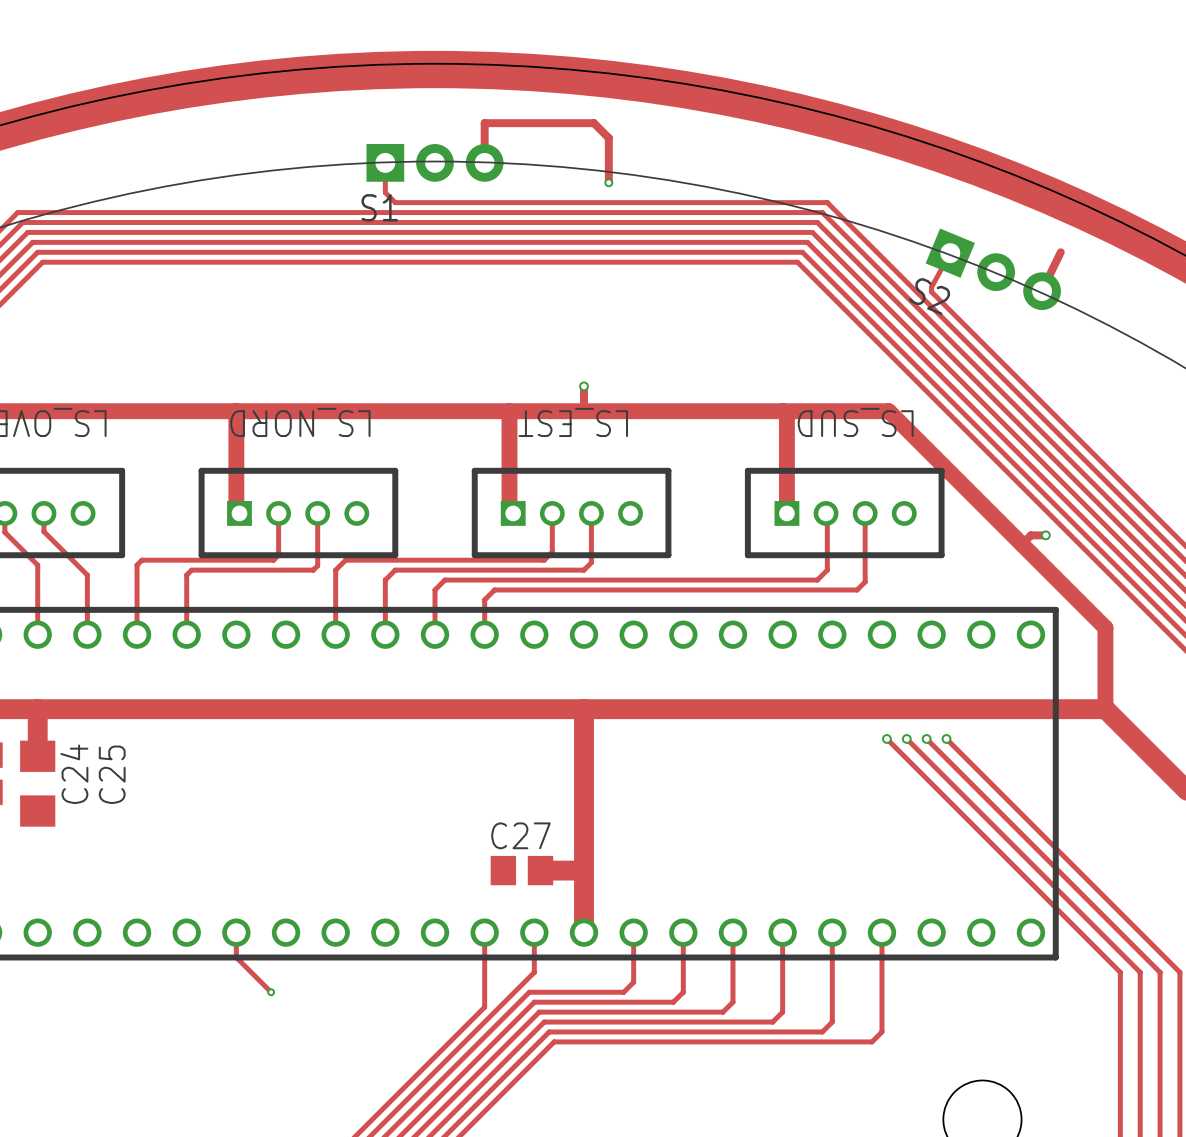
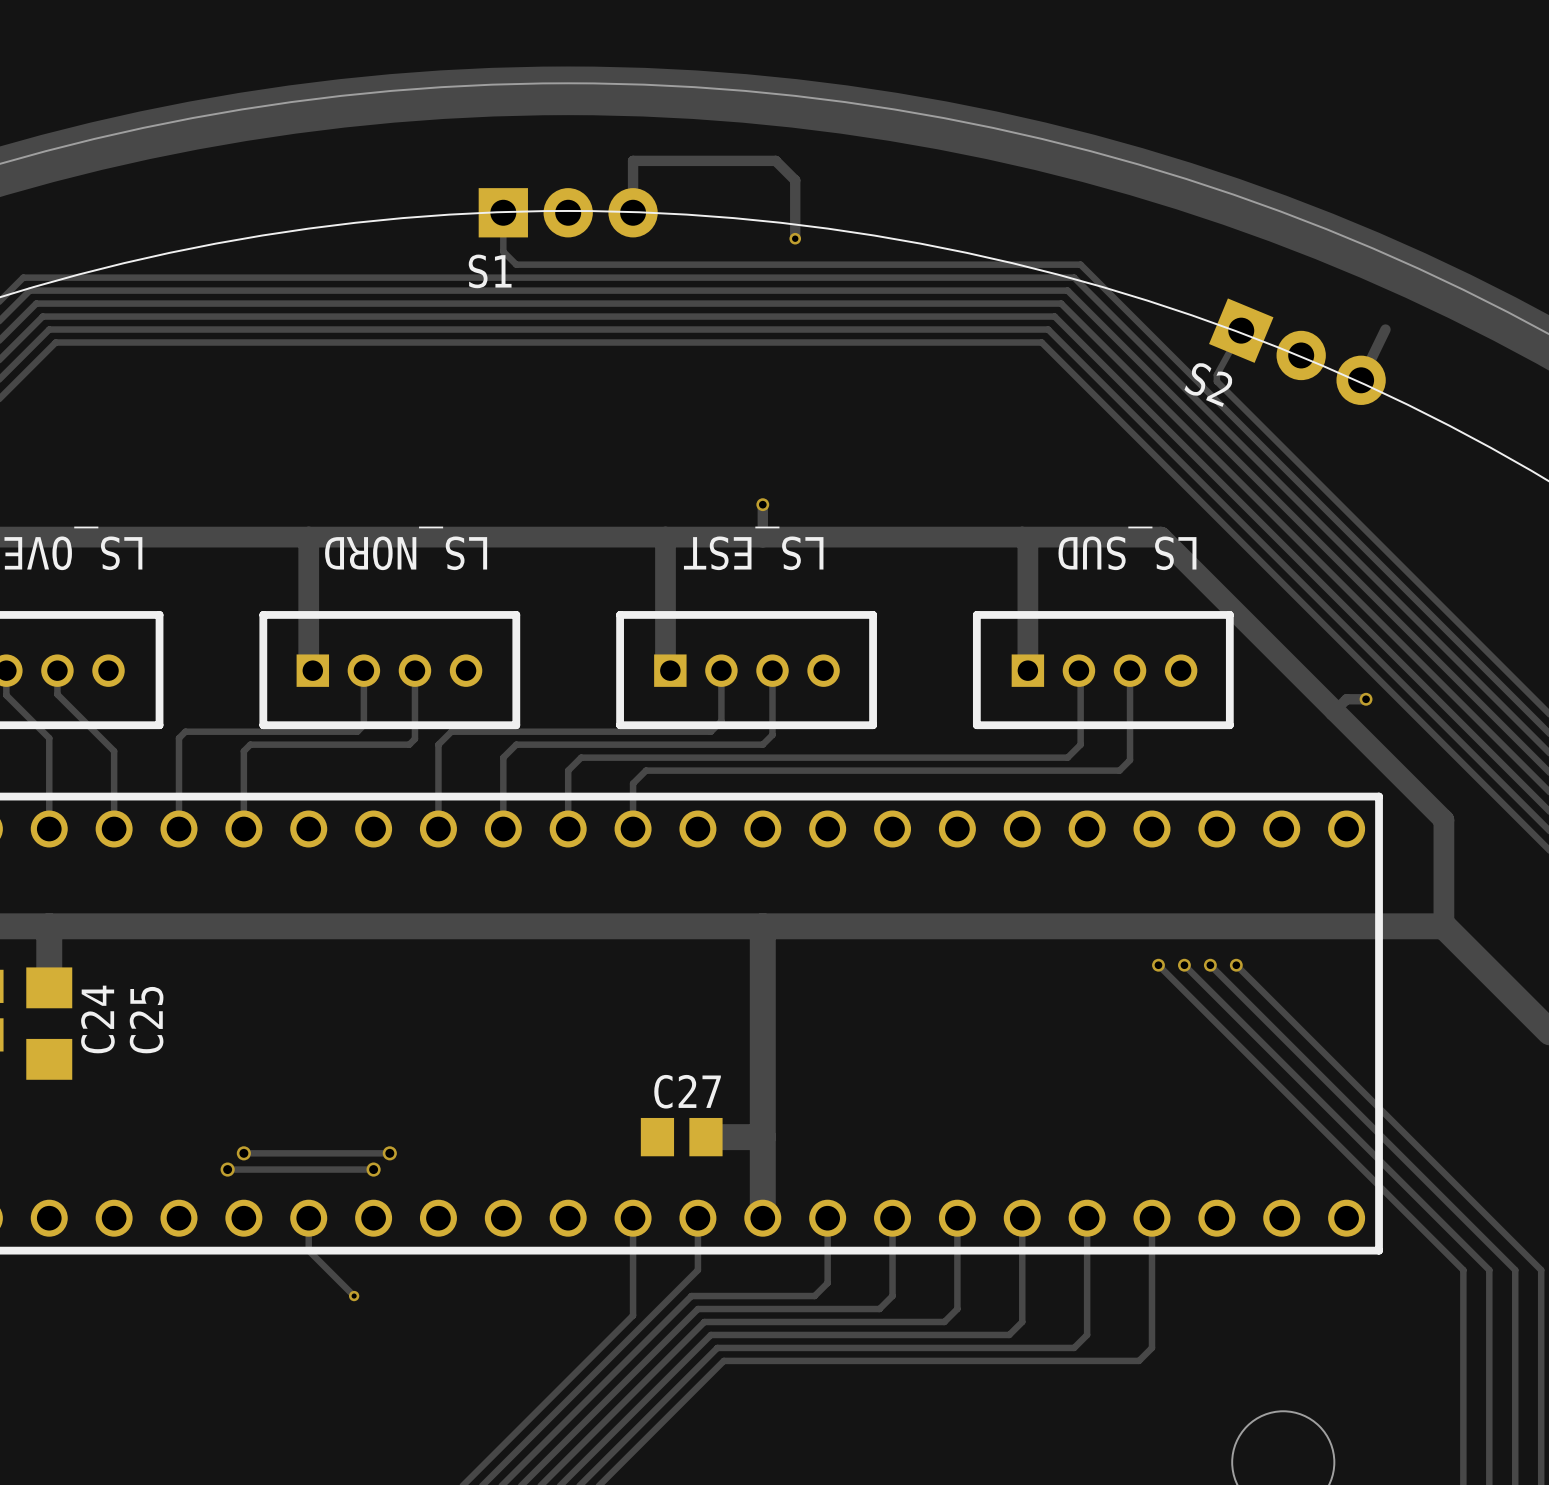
track: none -> (243, 1153) (389, 1153)
via: none -> (243, 1153)
via: none -> (389, 1153)
track: none -> (227, 1169) (373, 1169)
via: none -> (227, 1169)
via: none -> (373, 1169)

